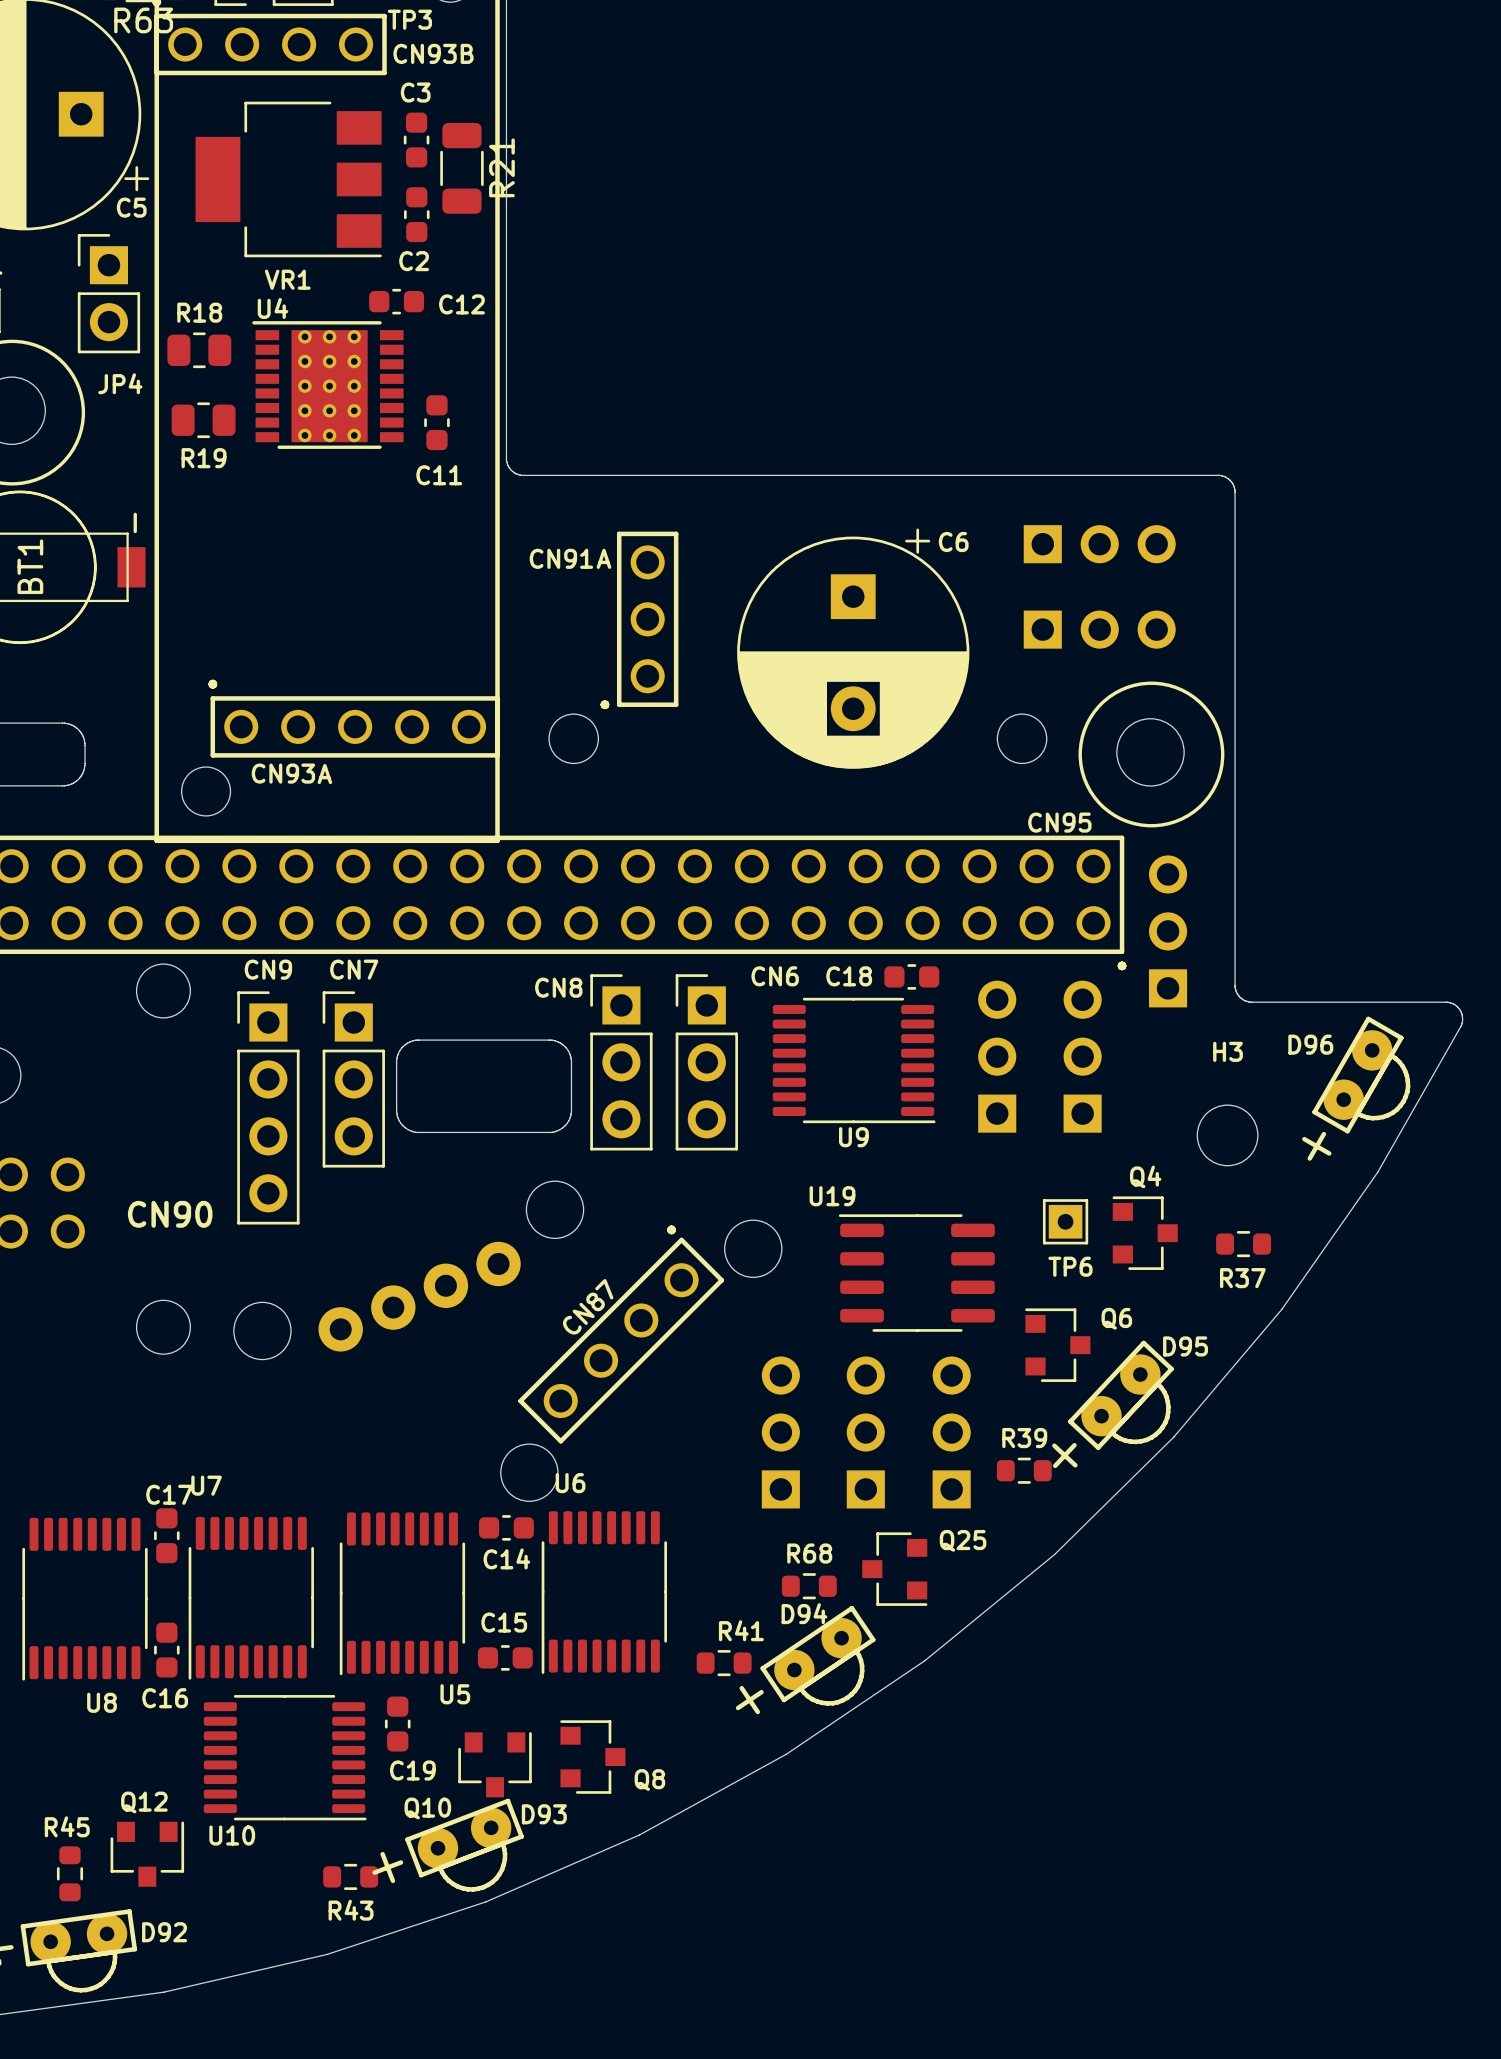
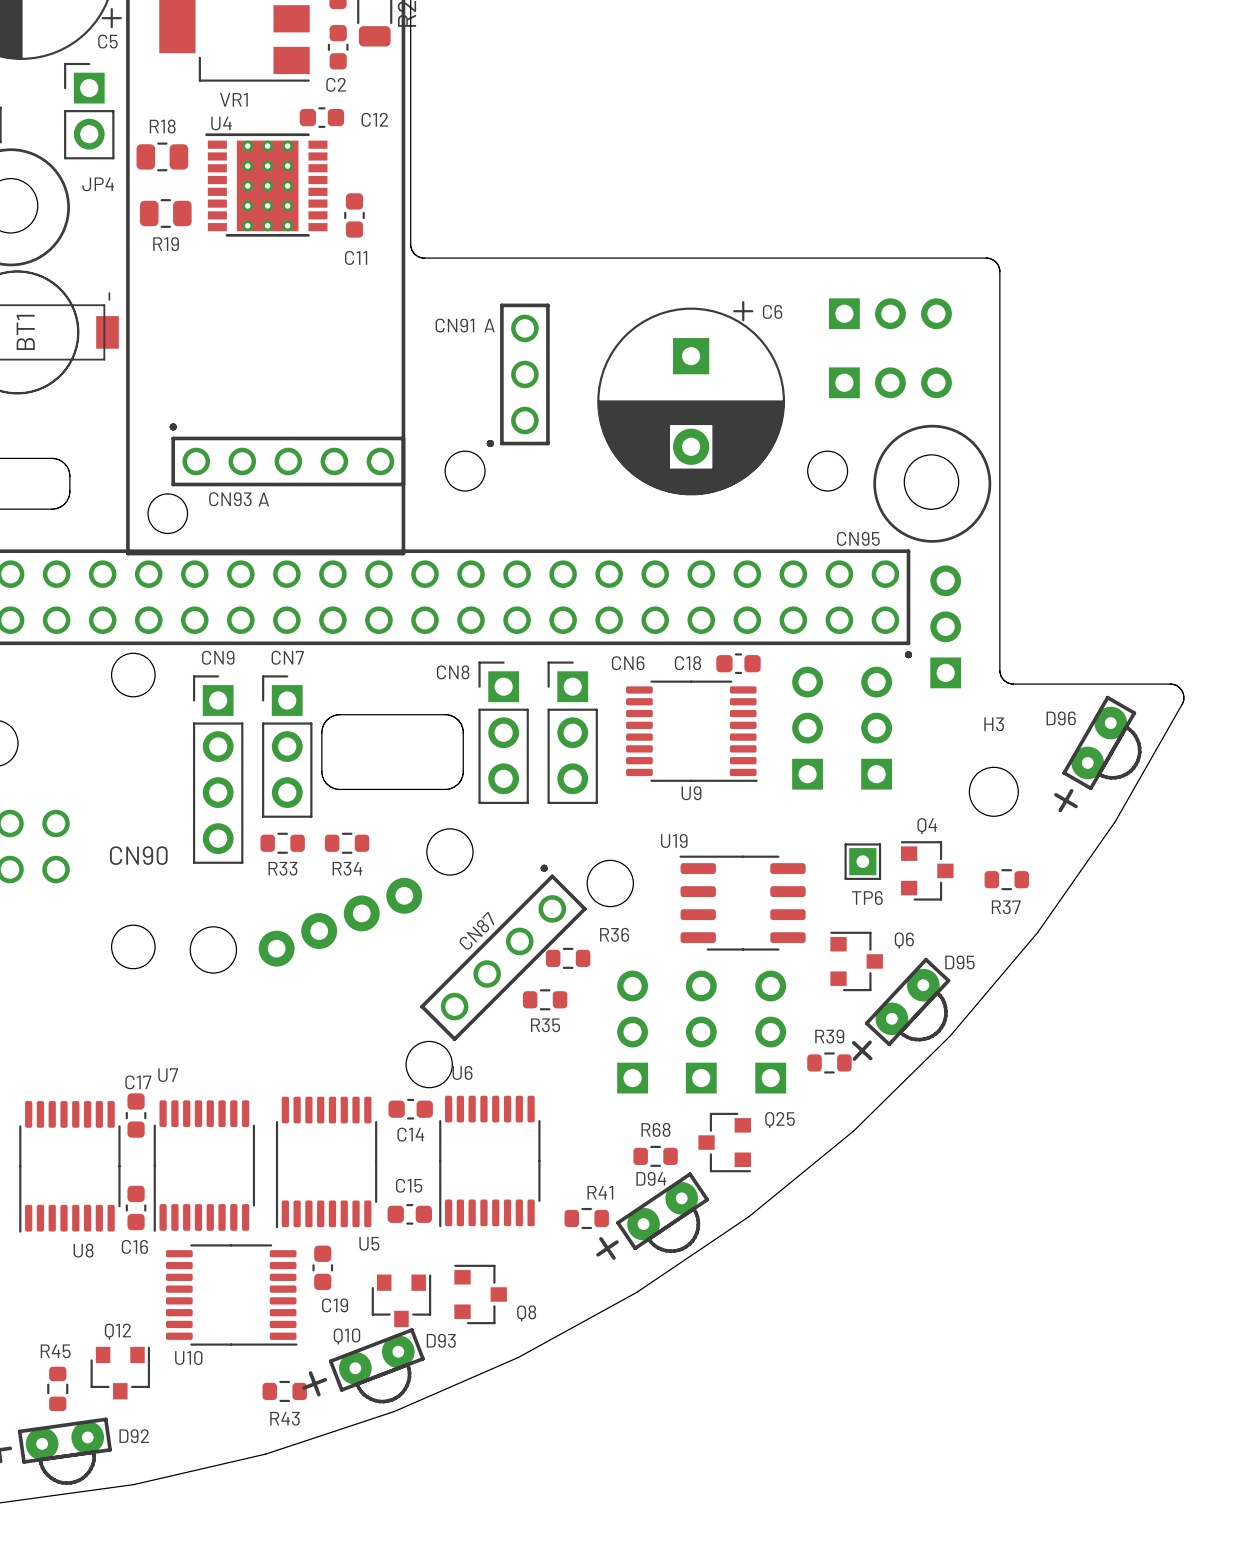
R33: none -> (282, 843)
R34: none -> (347, 843)
R36: none -> (568, 958)
R35: none -> (545, 999)

